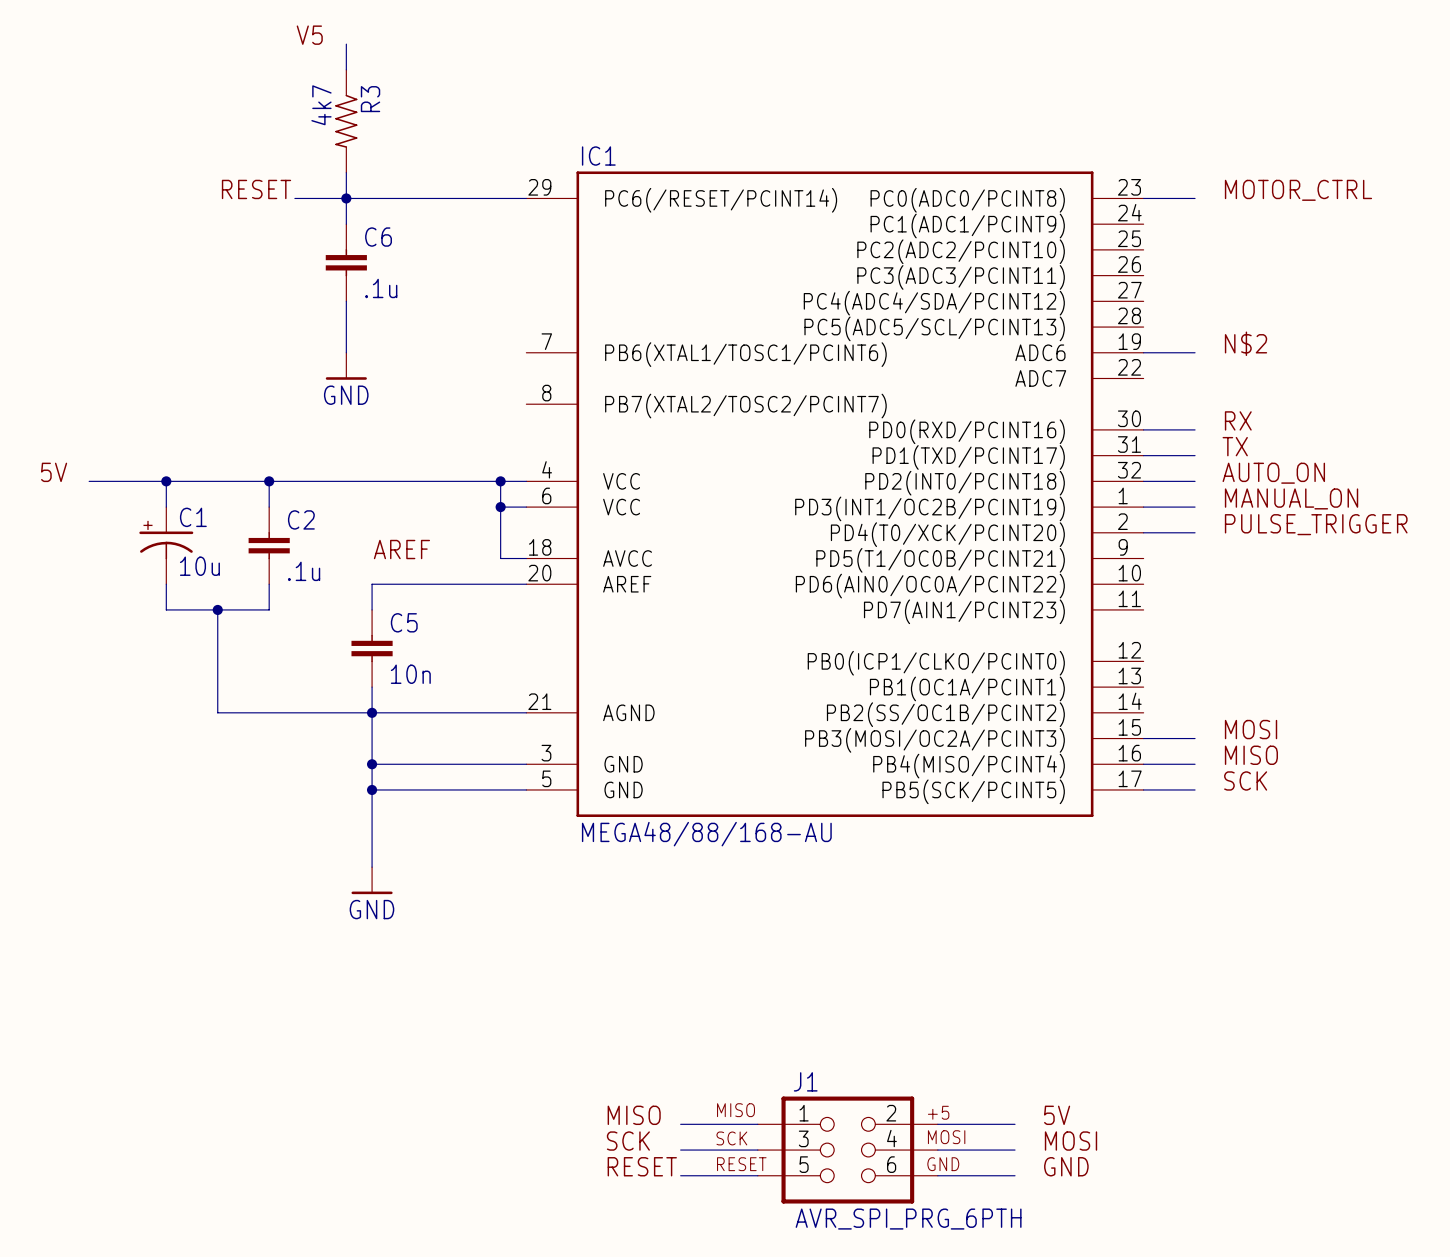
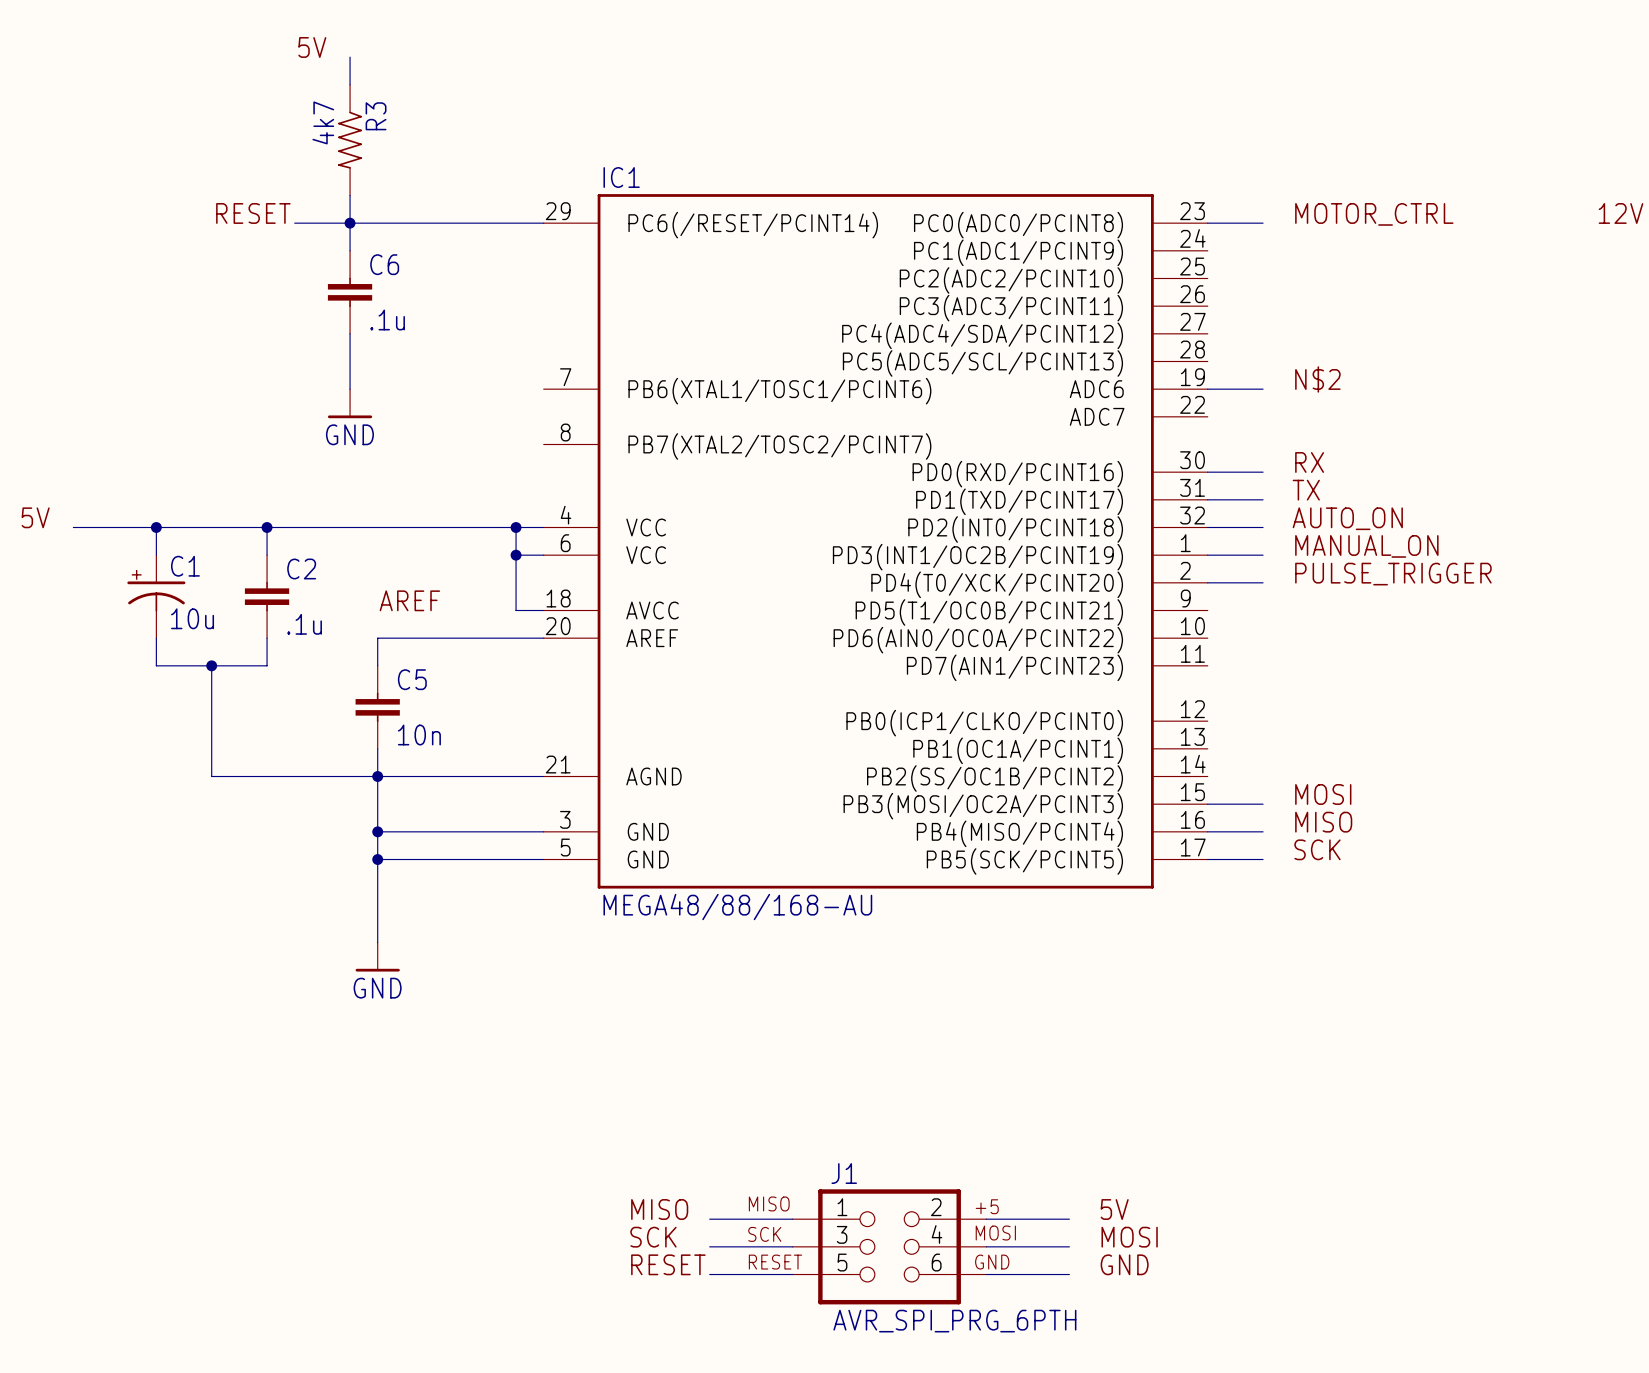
label: V5 (309, 35) -> 5V (312, 47)

